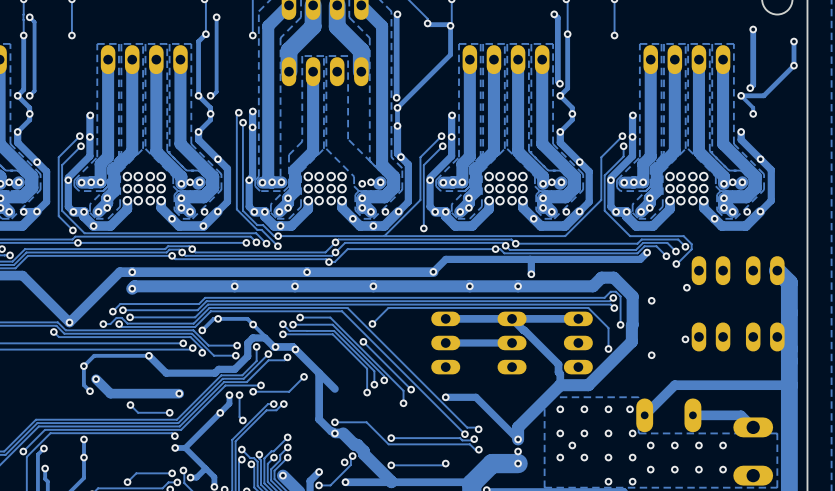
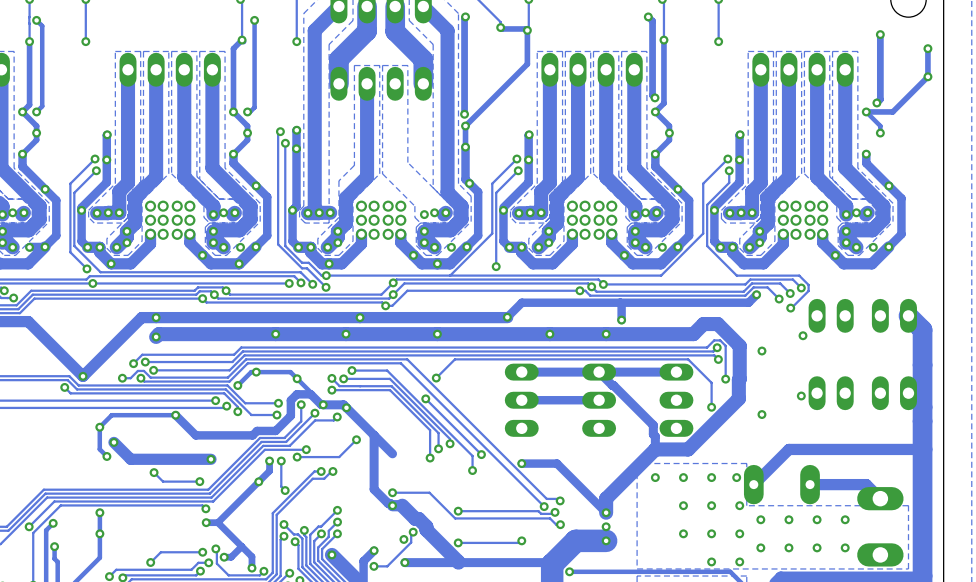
via: (560, 433) -> none
via: (572, 445) -> none
via: (560, 457) -> none

